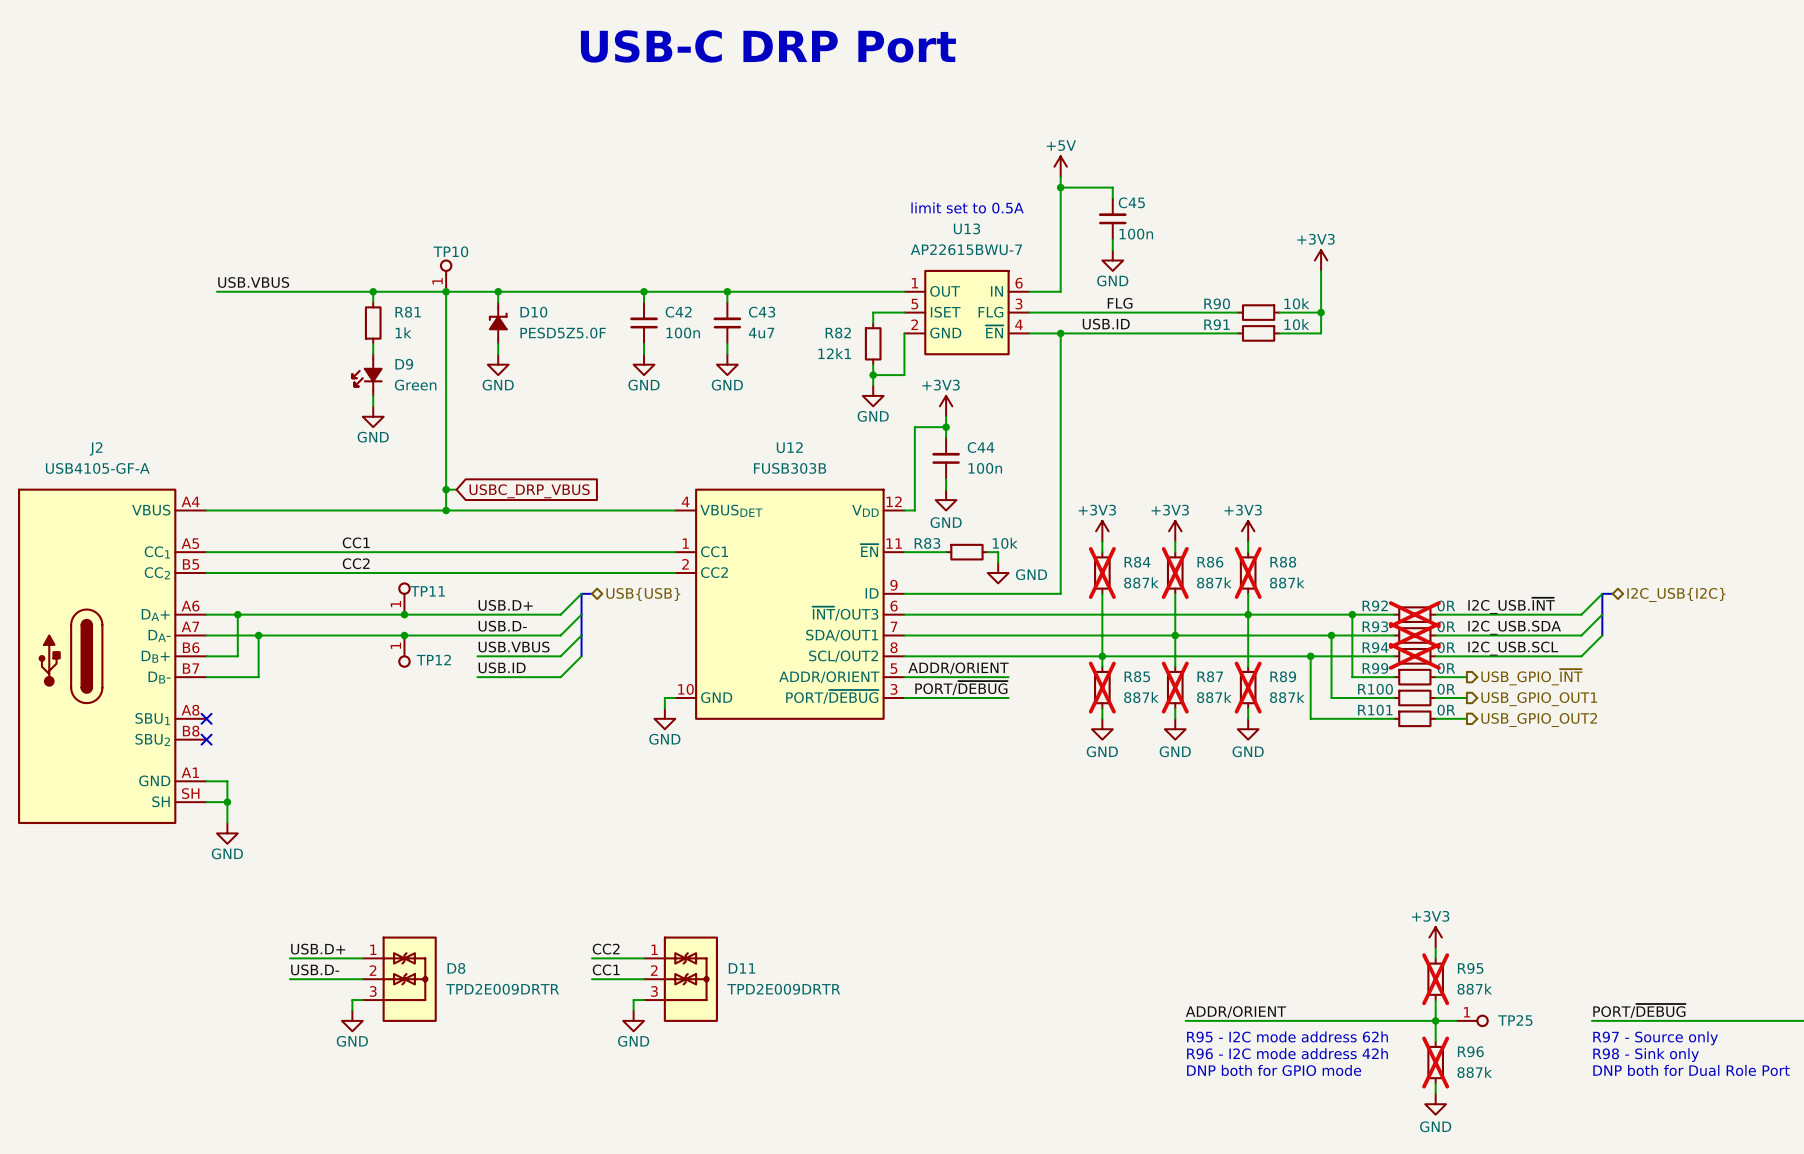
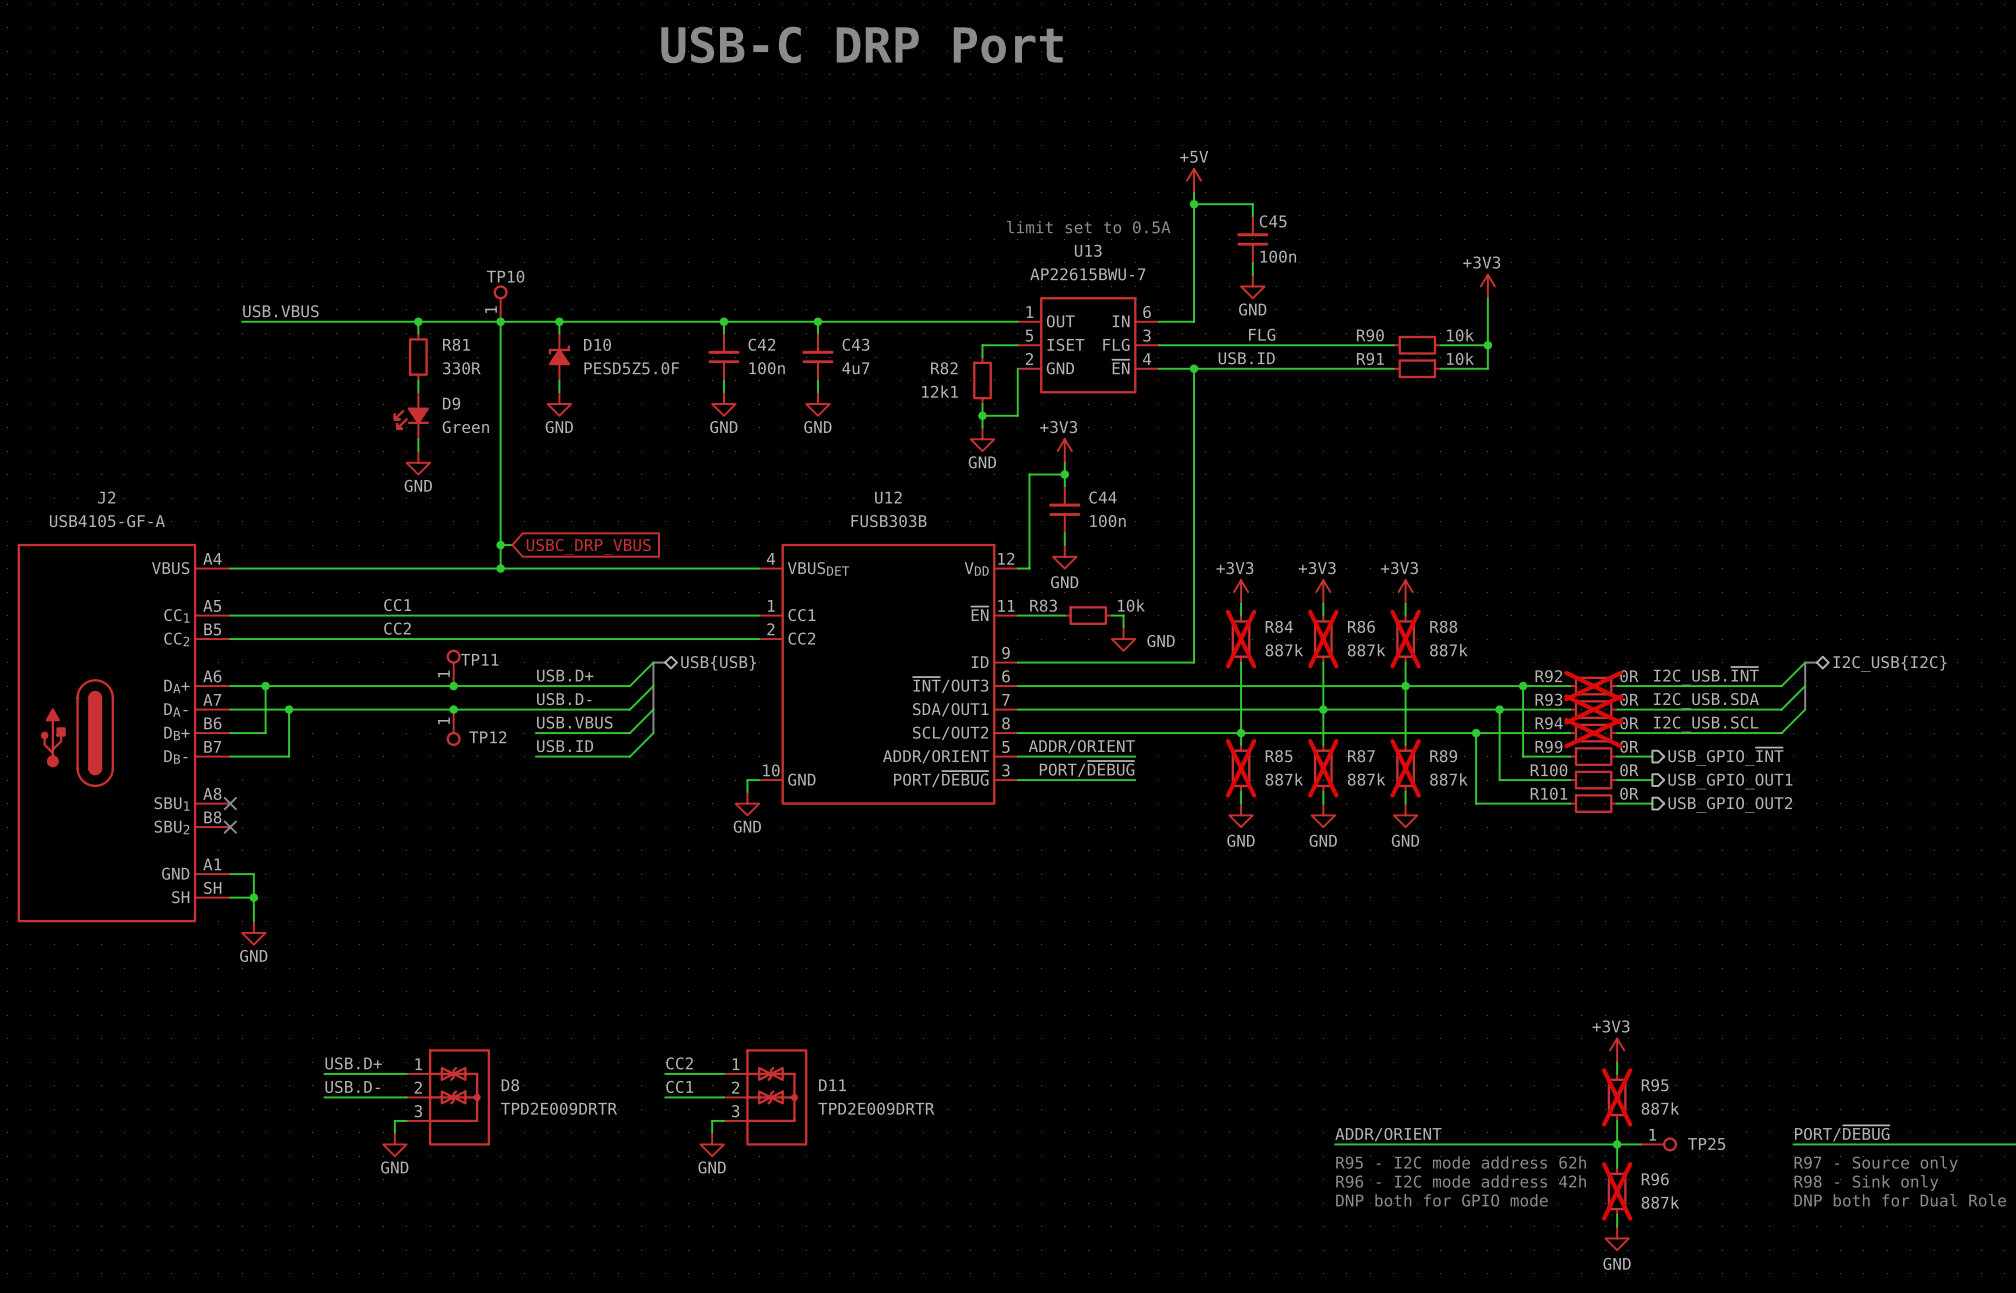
R81 text: 1k (403, 332) -> 330R (461, 368)

